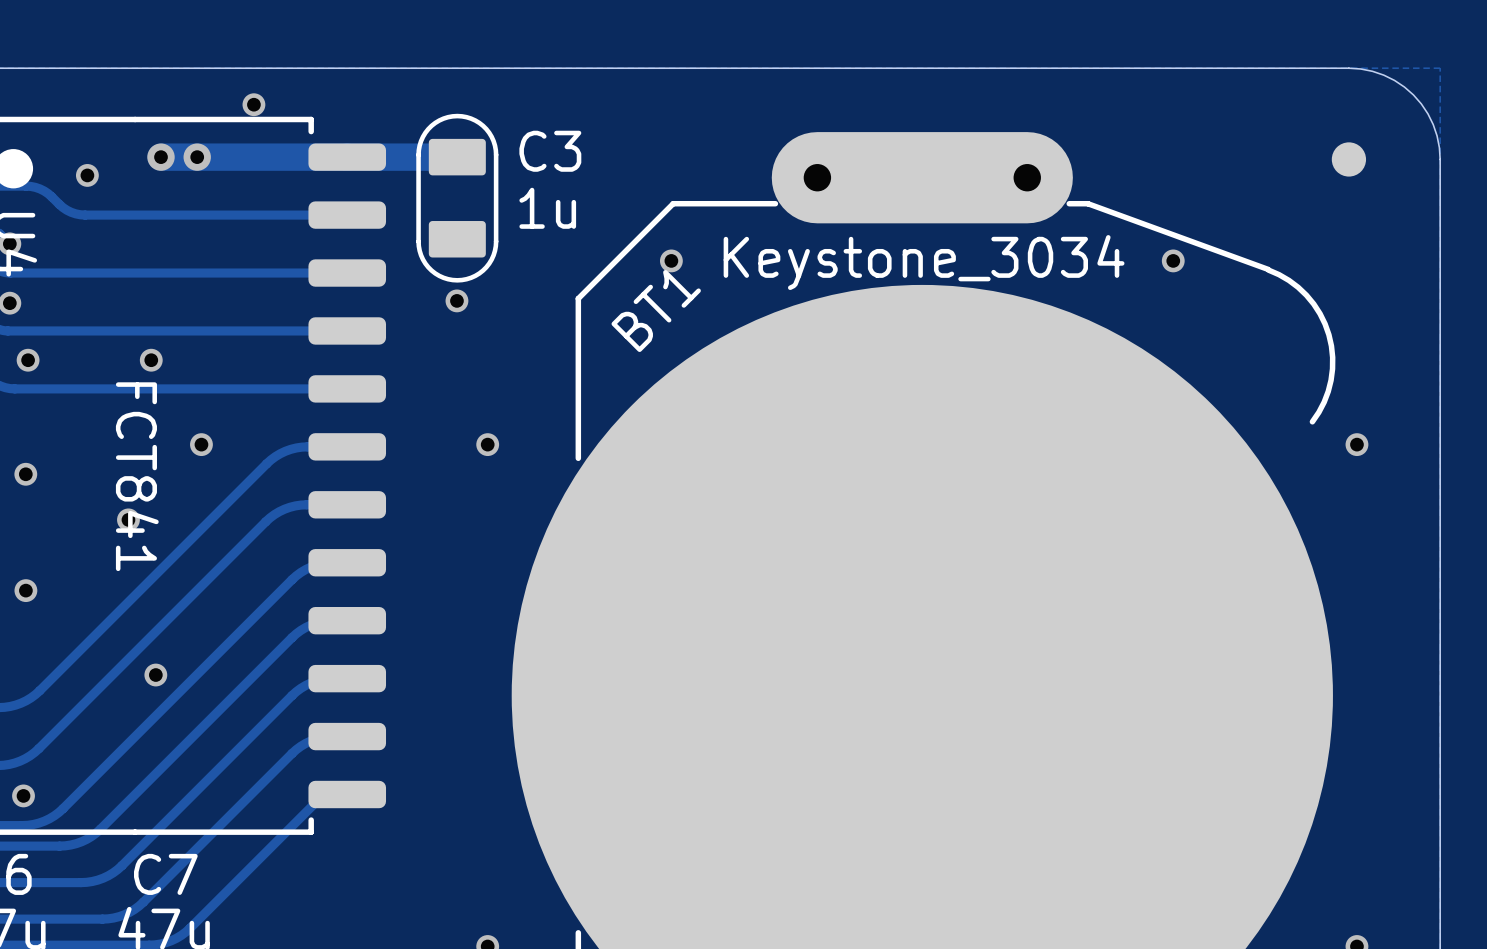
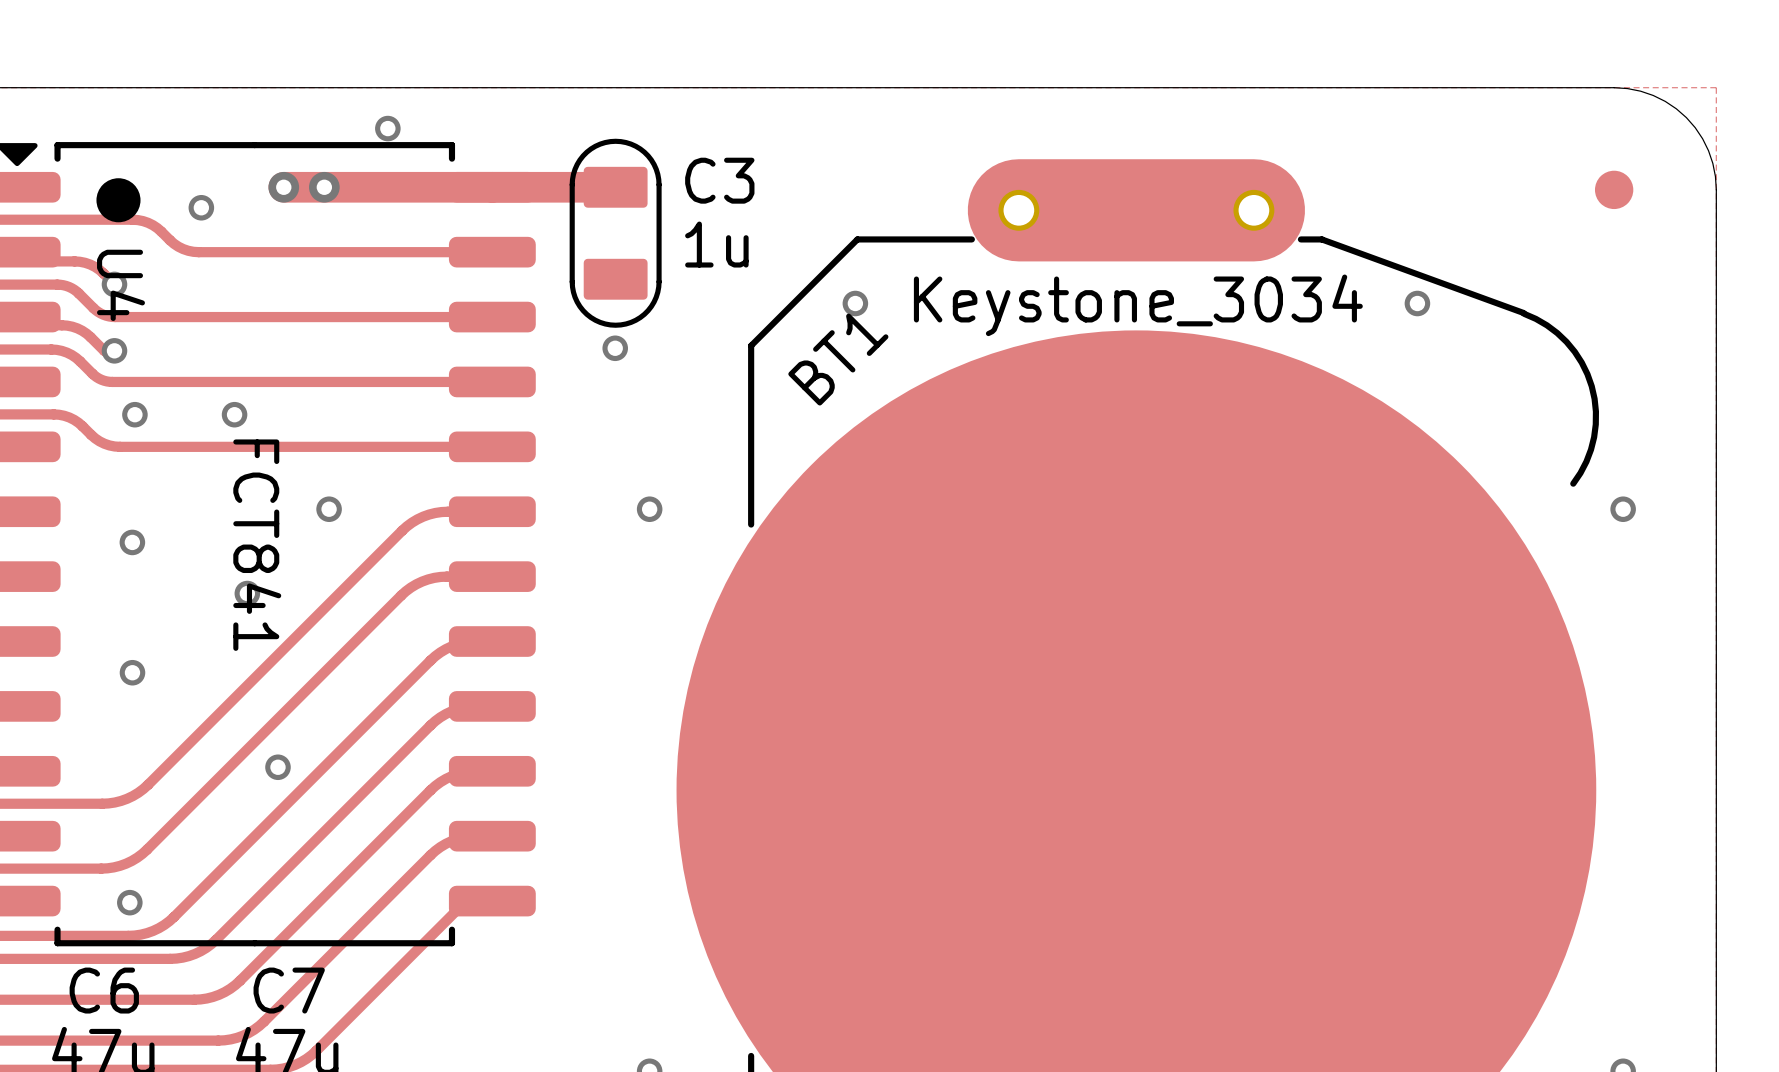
via position: (151, 360) -> (234, 414)

